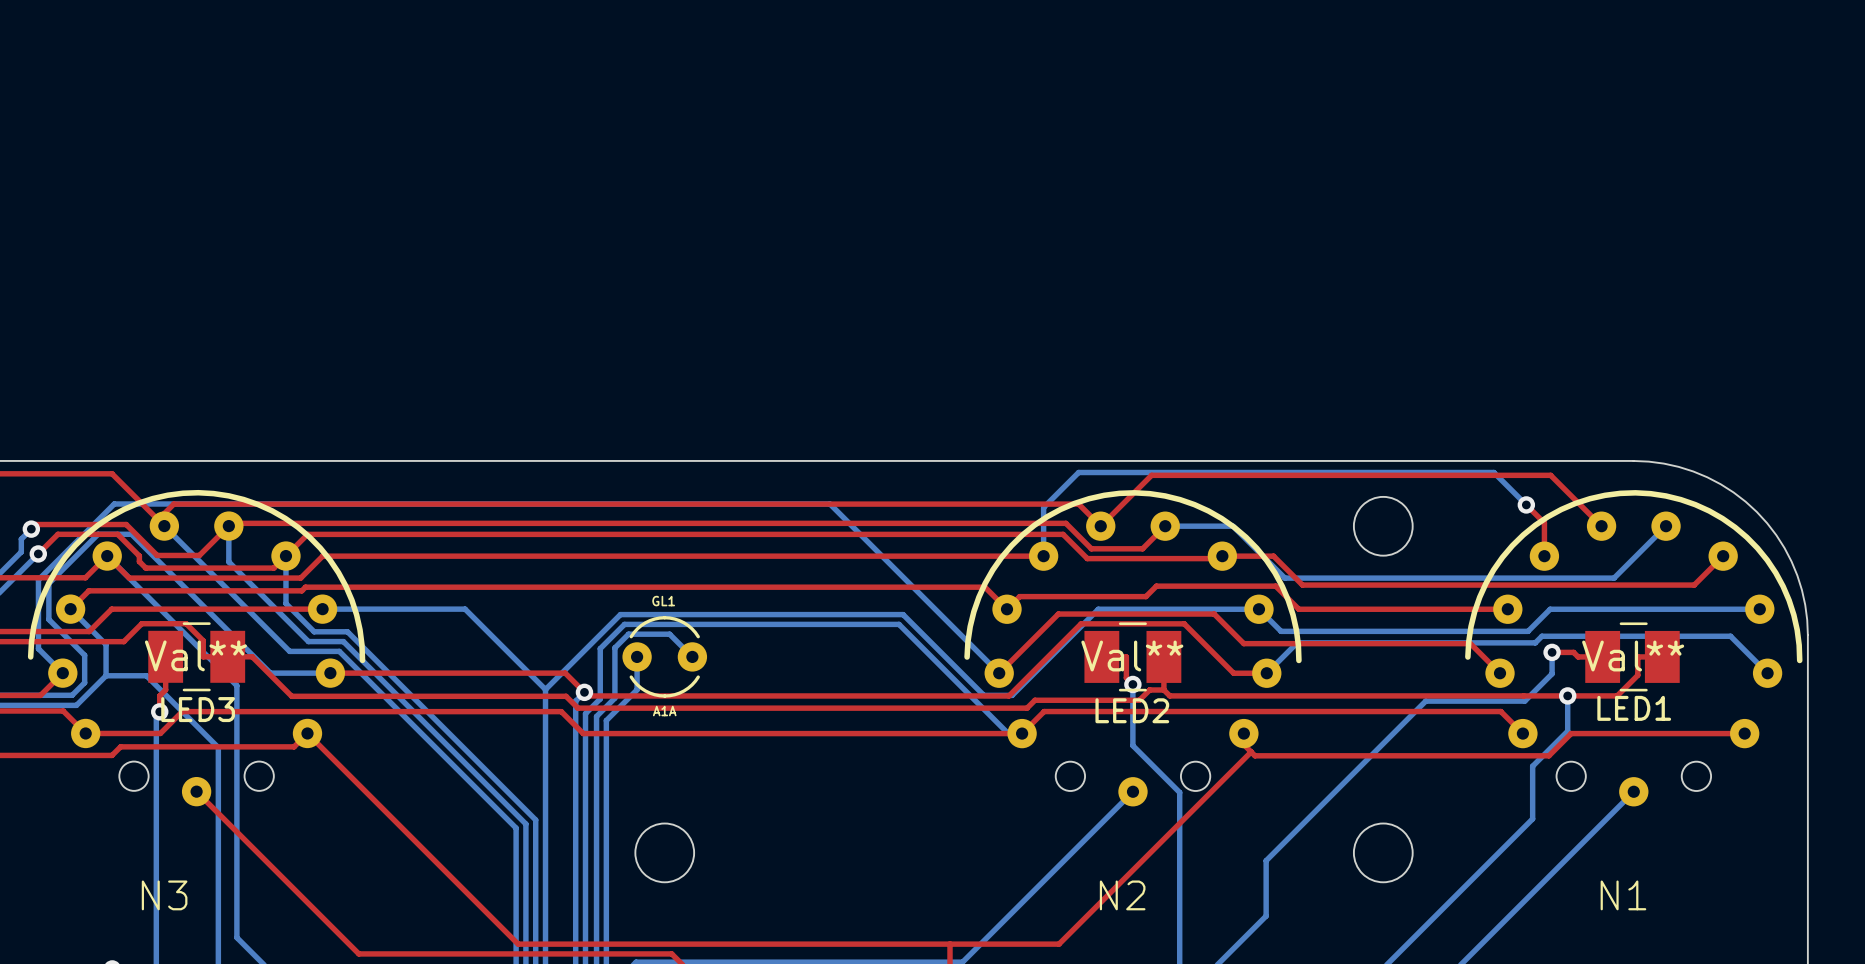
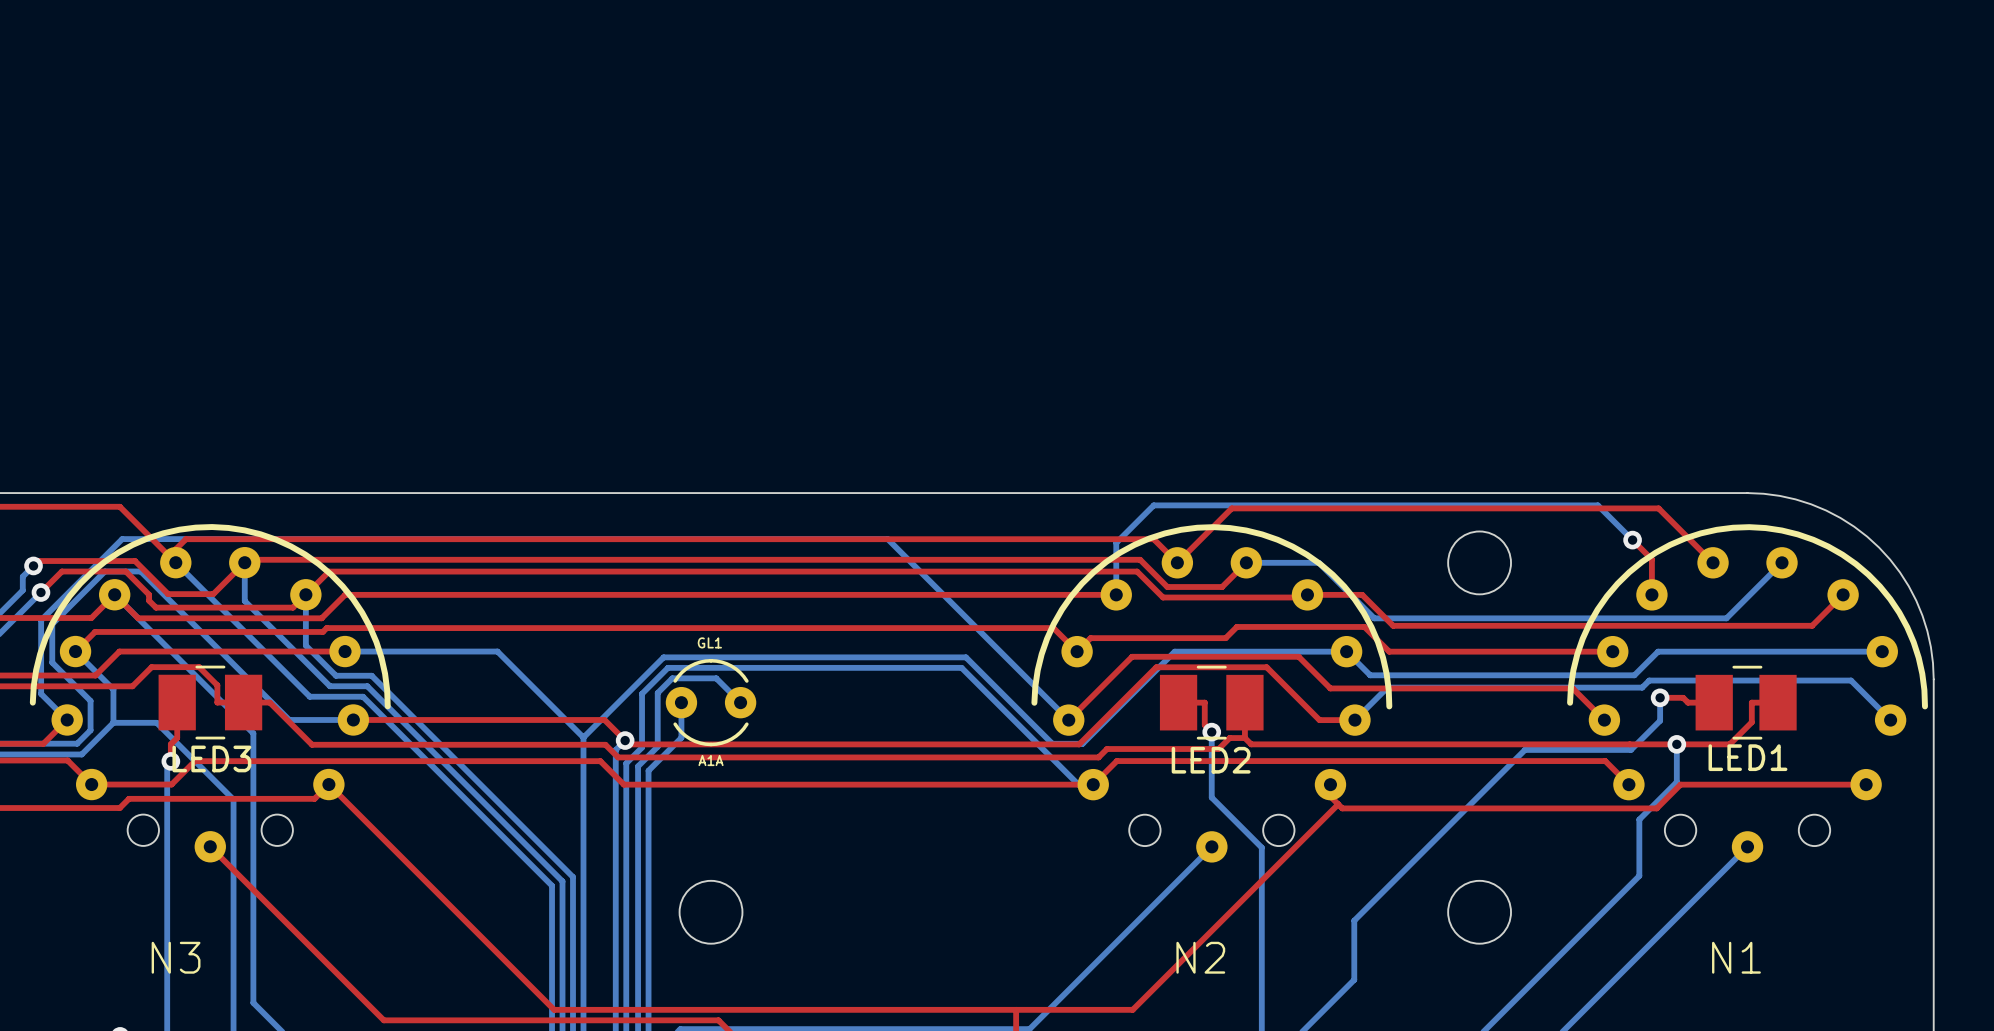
N3 value: Val** (195, 655) -> none
N2 value: Val** (1132, 656) -> none
N1 value: Val** (1633, 656) -> none

